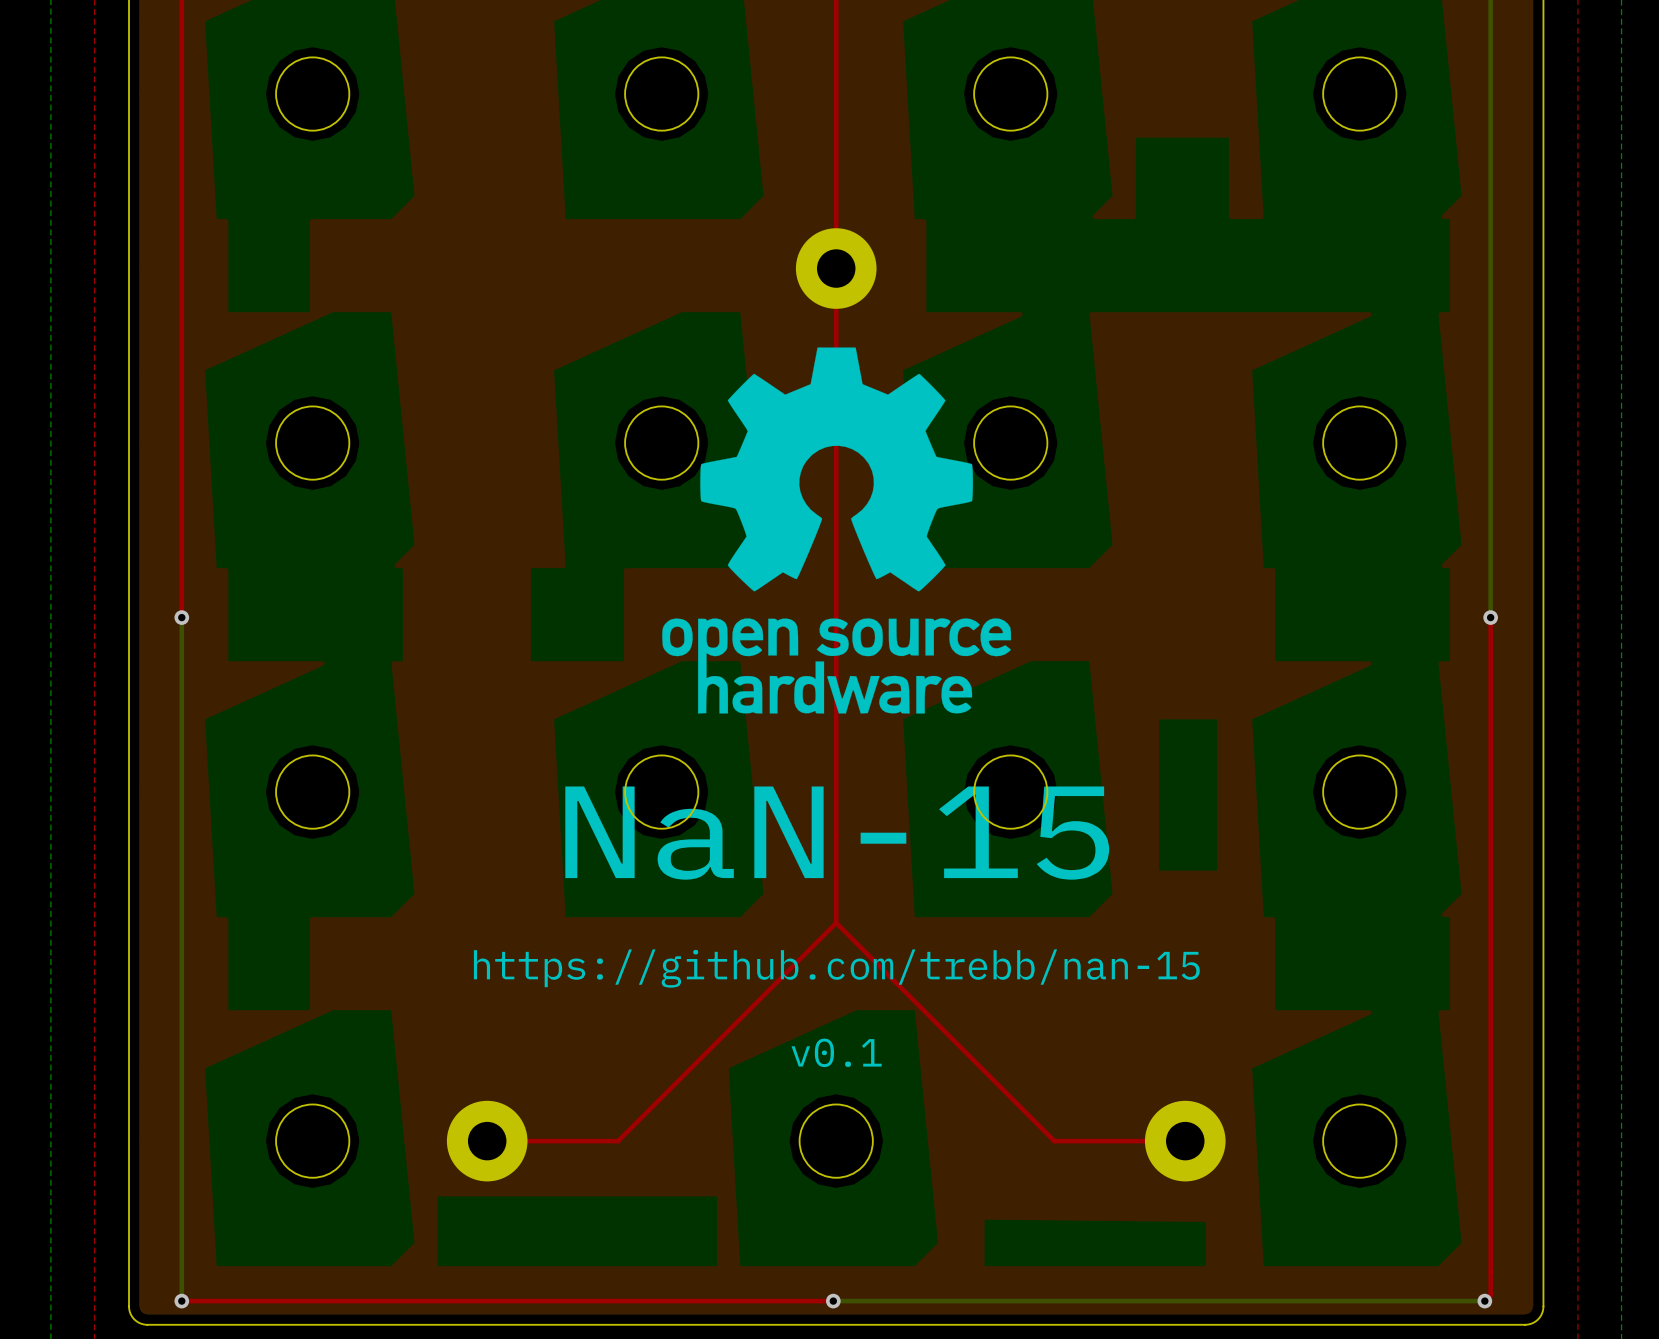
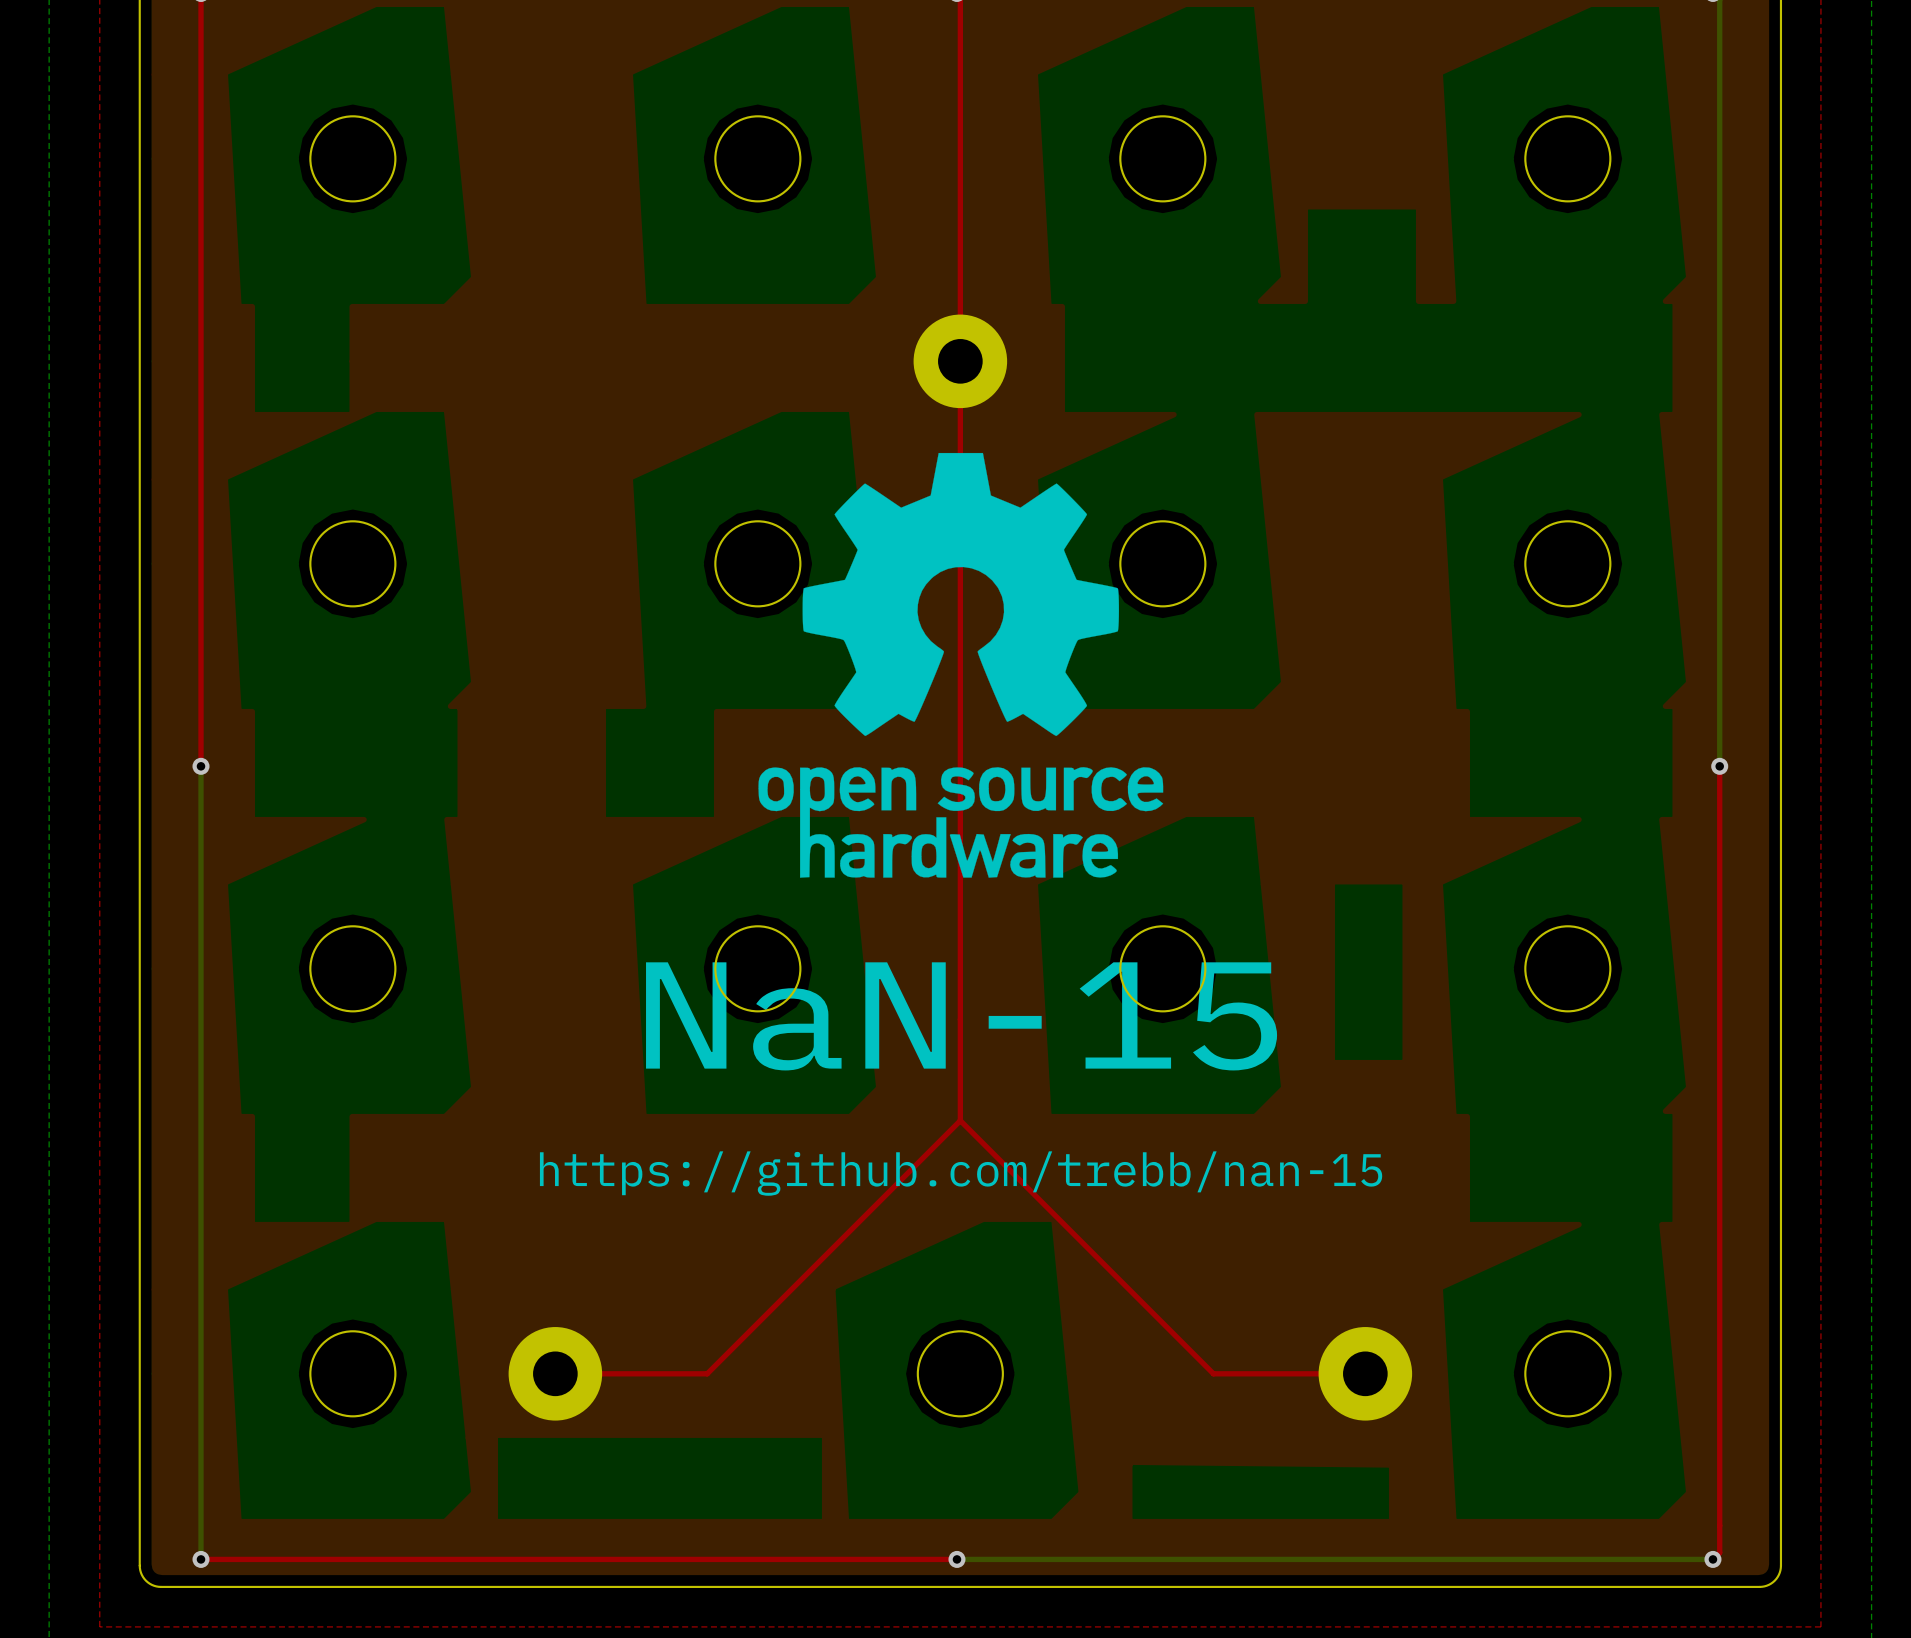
text: v0.1 (836, 1052) -> none

